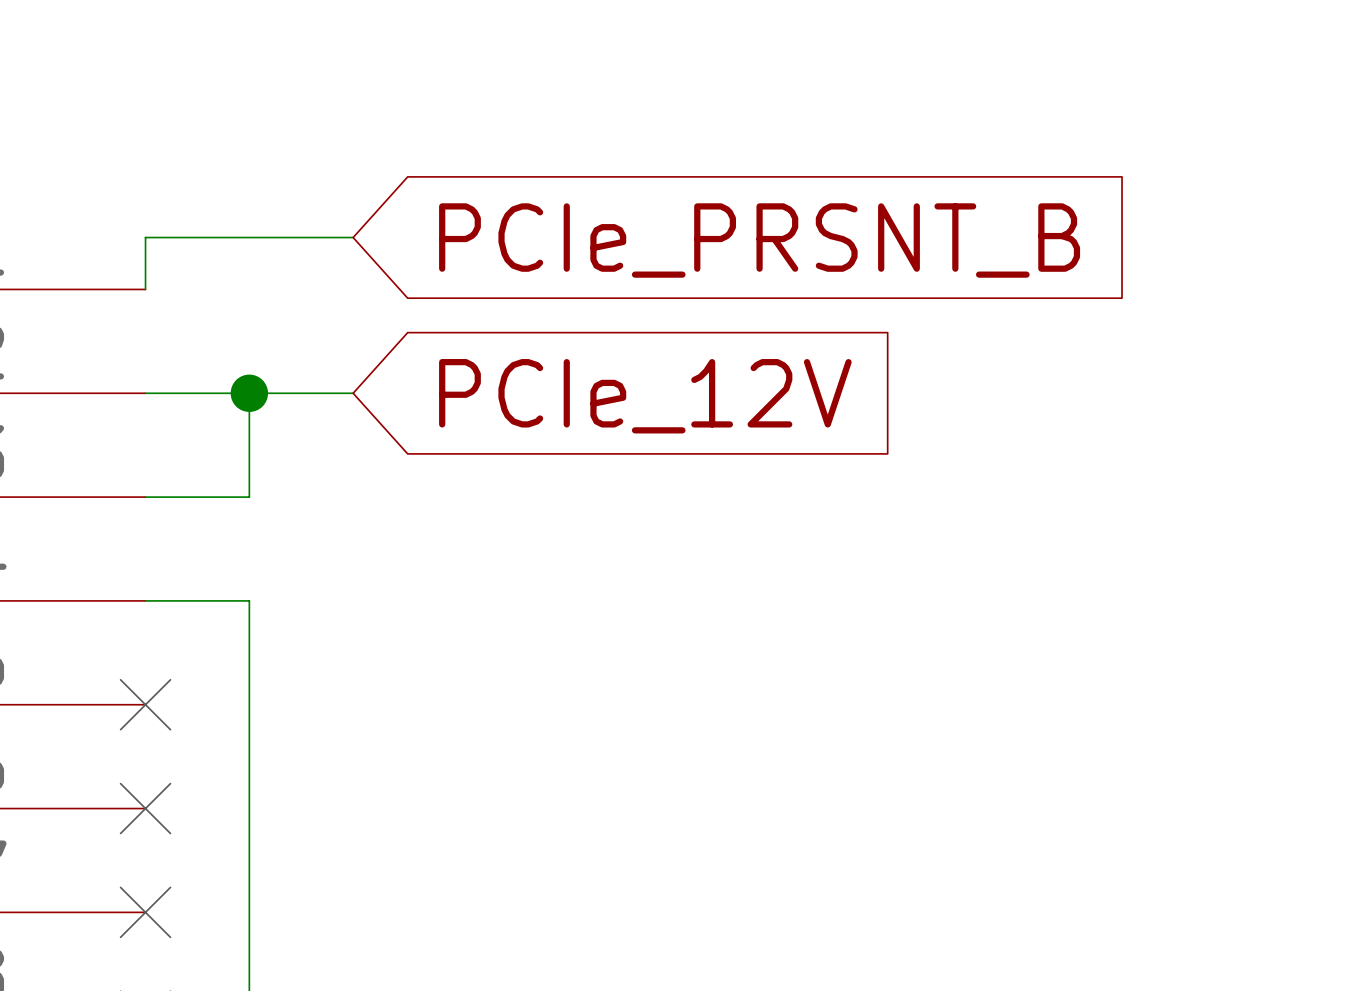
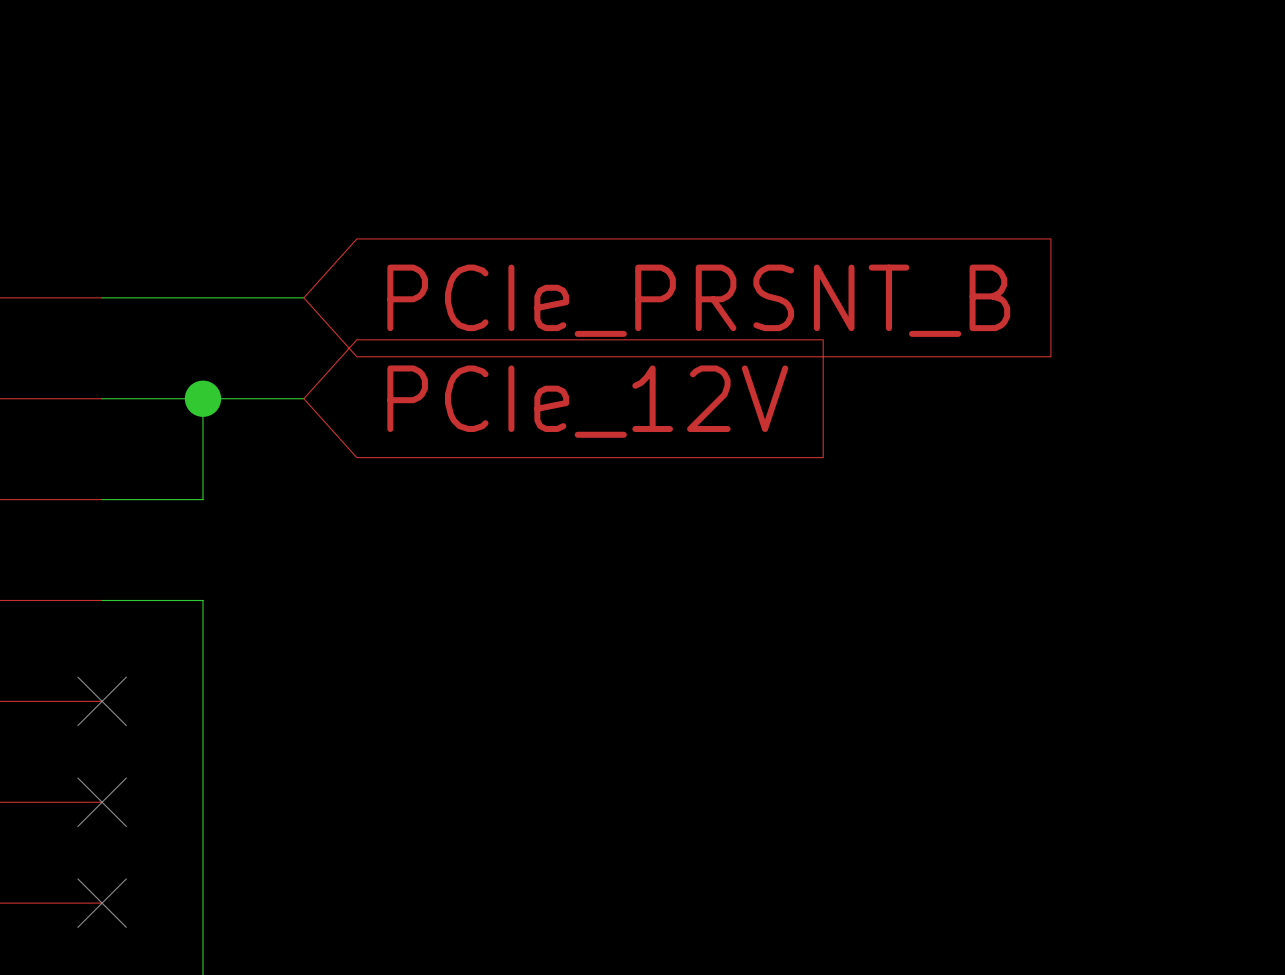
wire: (353, 237) (145, 237) (145, 289) -> (303, 297) (102, 297)
global label position: PCIe_PRSNT_B (759, 240) -> PCIe_PRSNT_B (698, 300)

